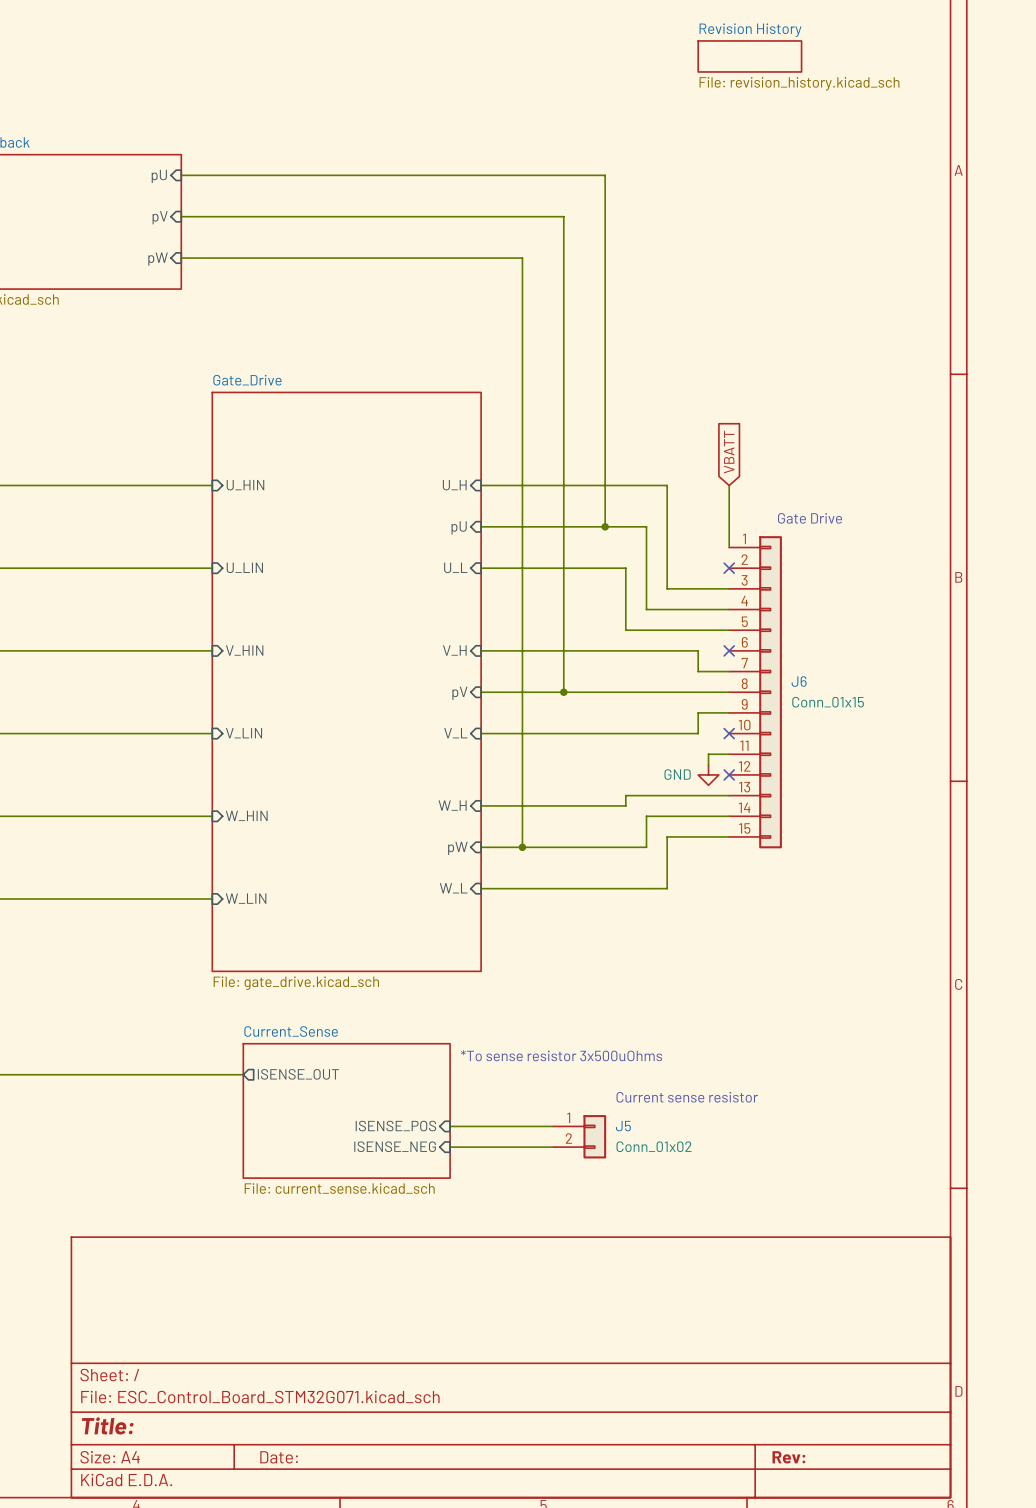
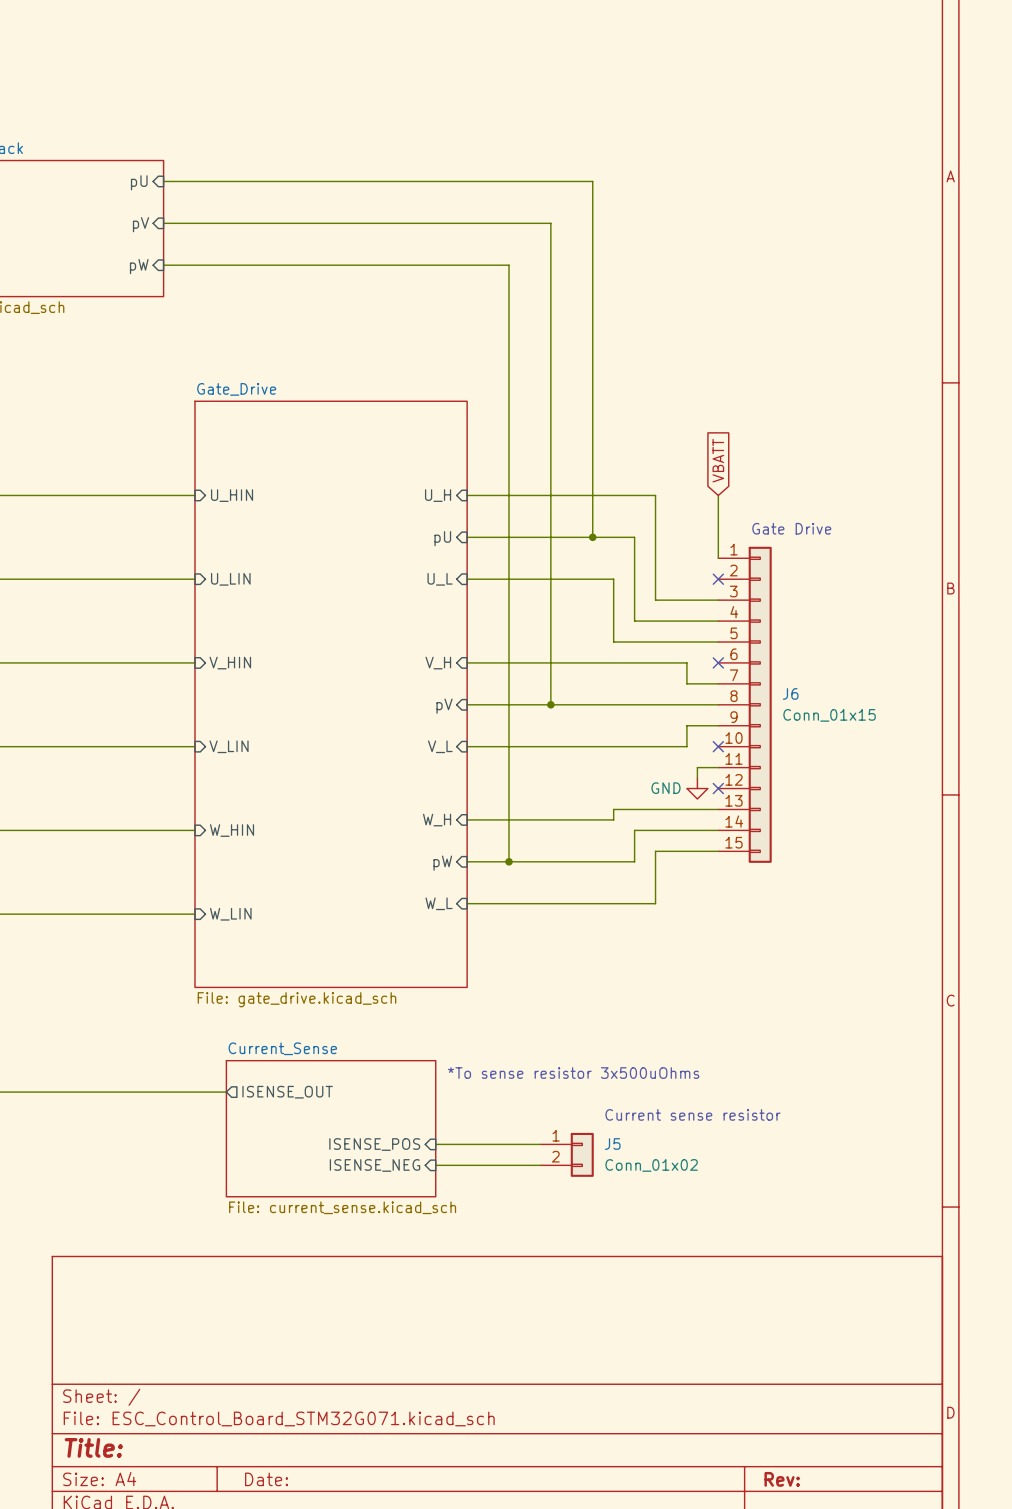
sheet Revision History: File: revision_history.kicad_sch (749, 56) -> none

